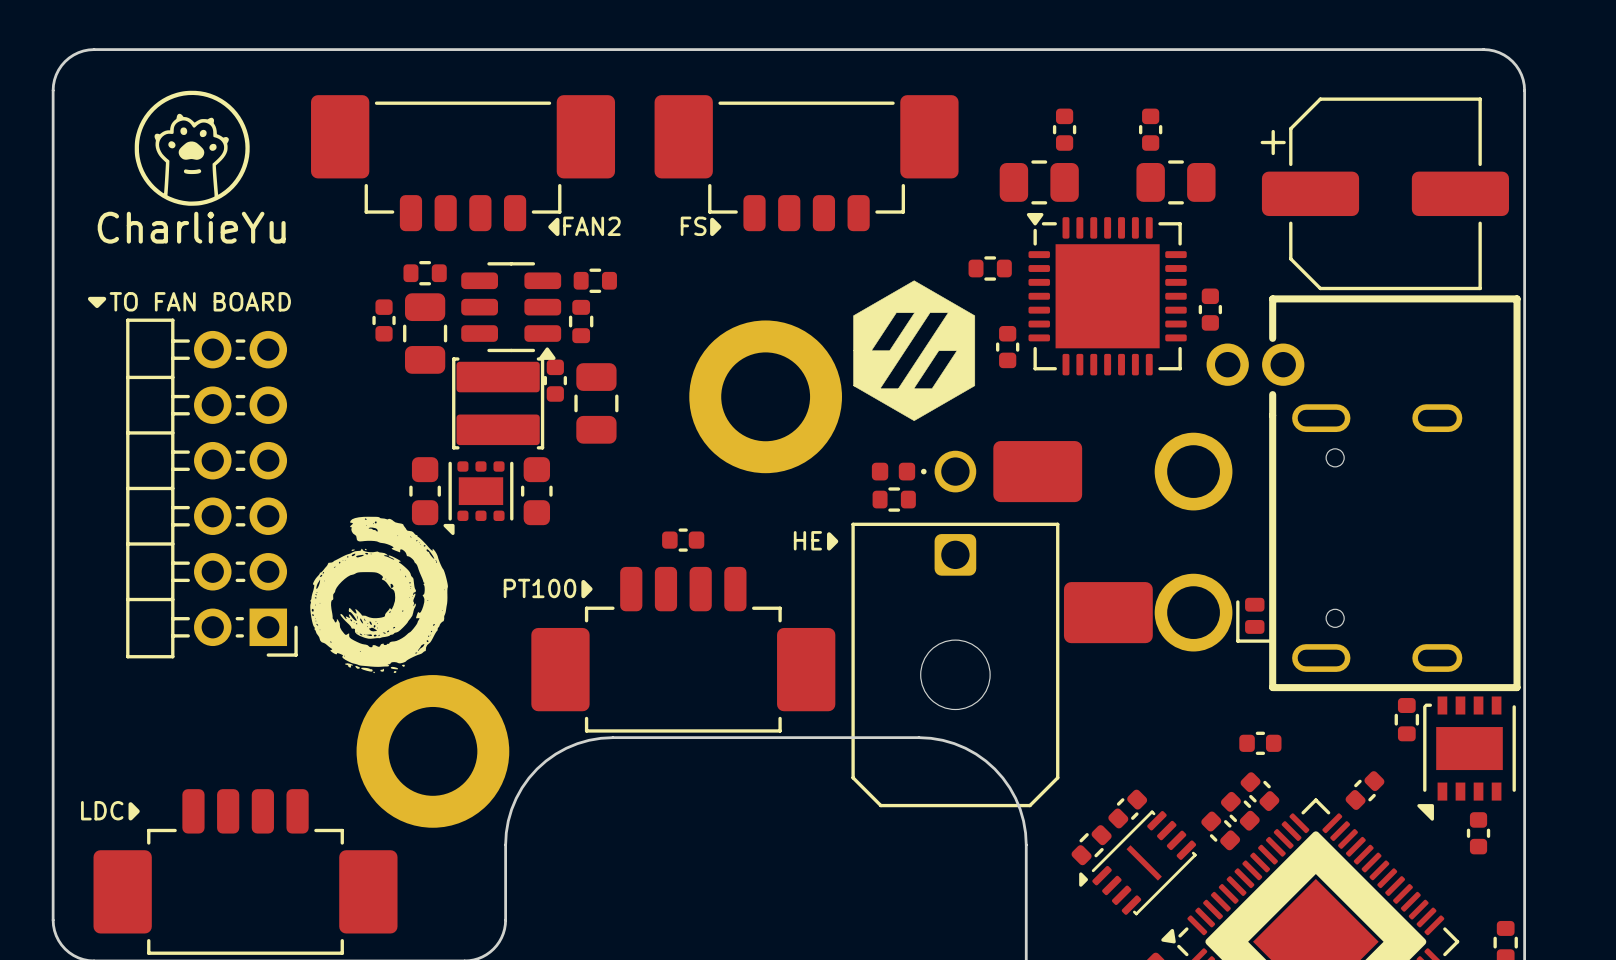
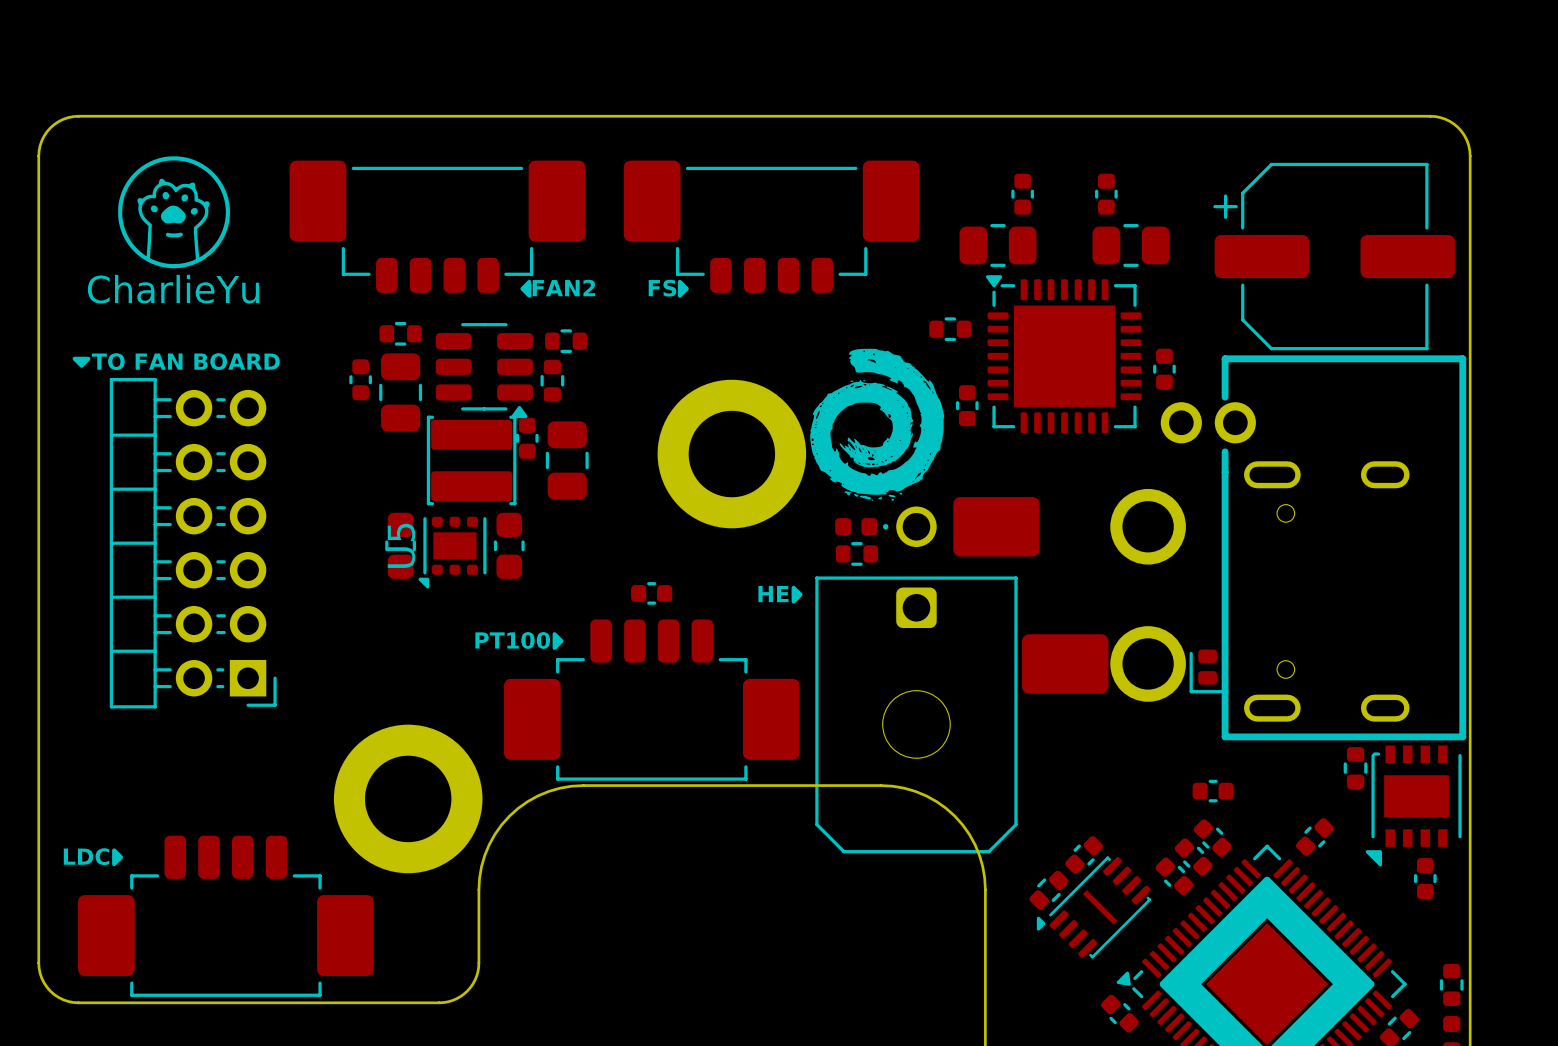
drawing: [853, 280, 976, 421] -> none
U5 name: none -> U5 (401, 545)
drawing position: (379, 594) -> (877, 424)

